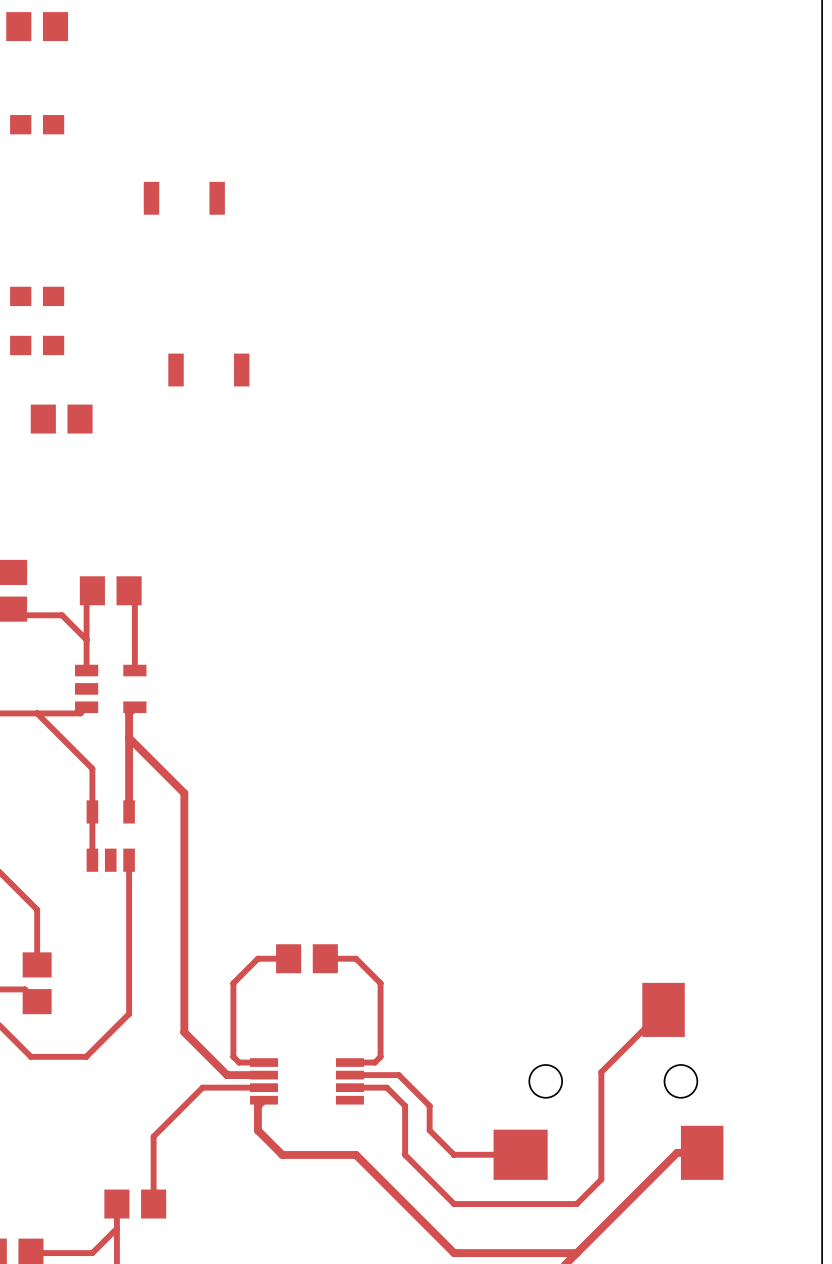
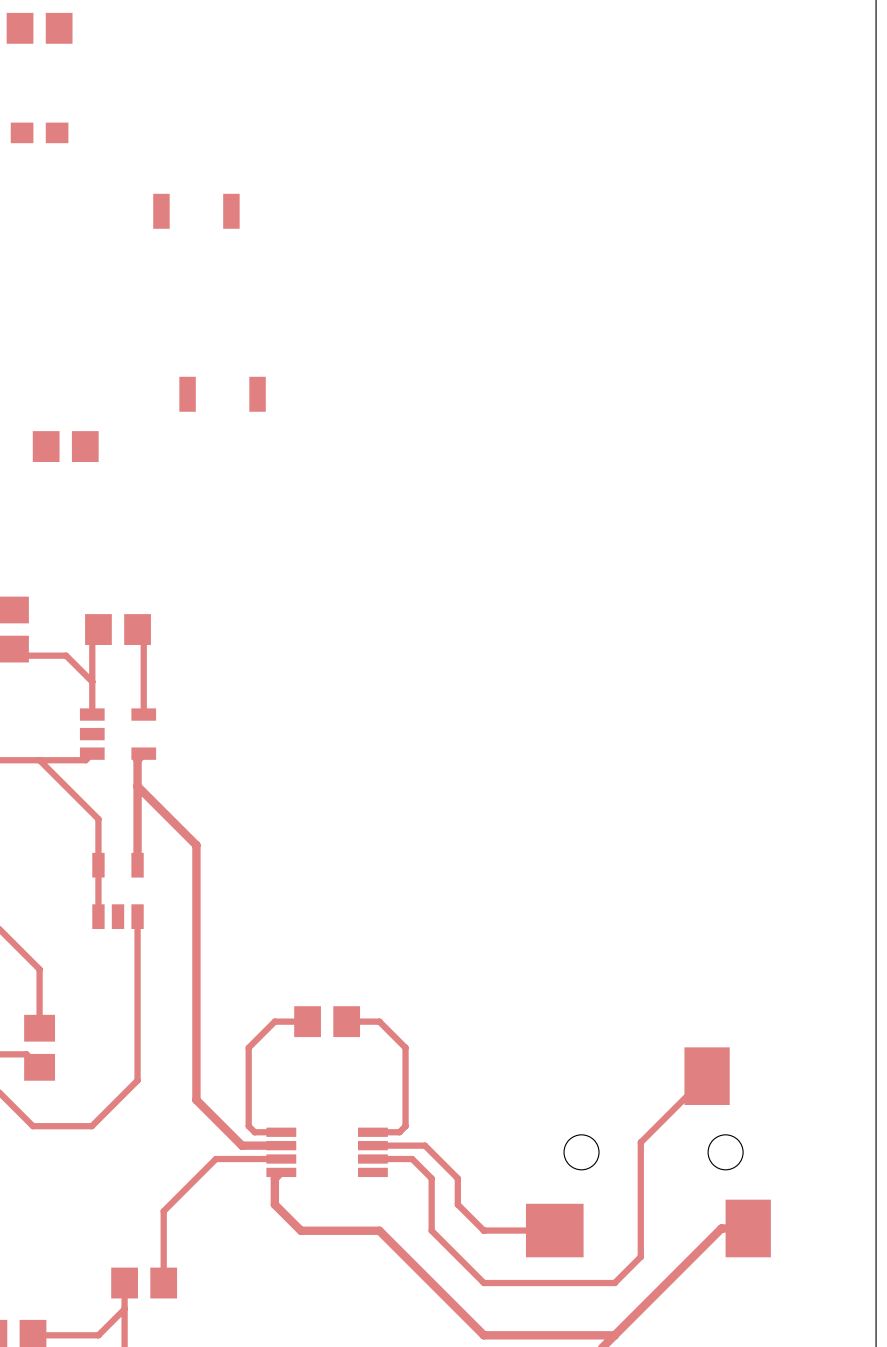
part: (37, 296) -> none
part: (37, 345) -> none

